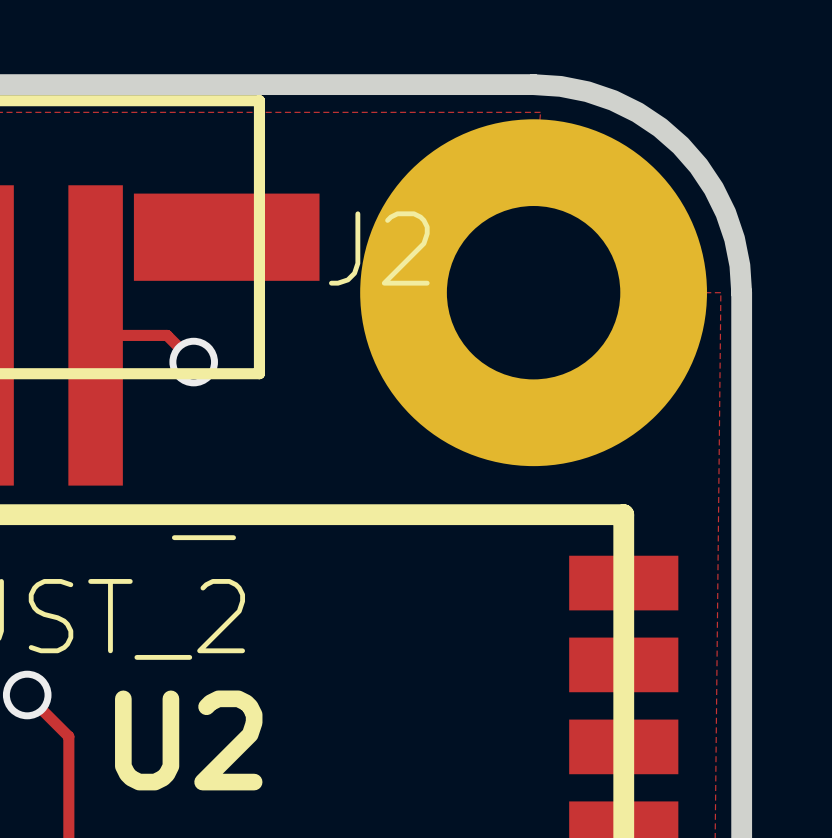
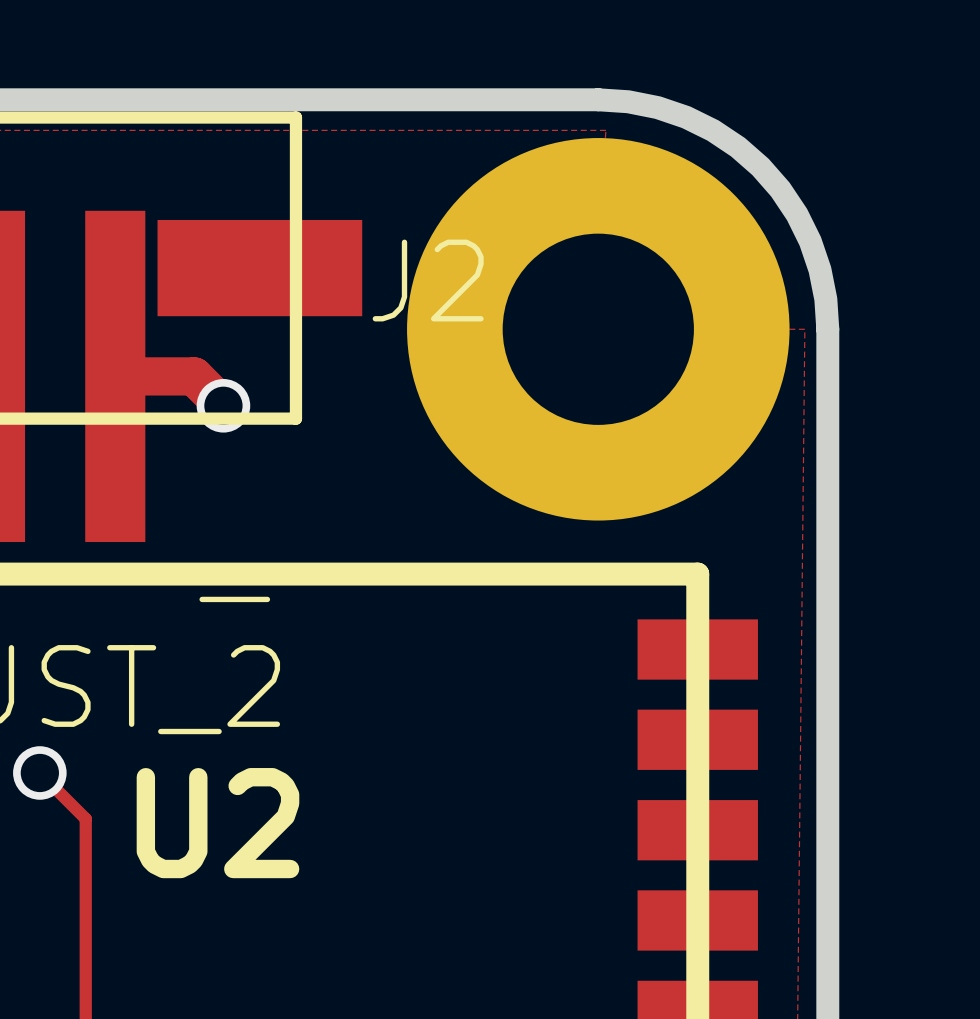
track width: thin (95, 335) (167, 335) (193, 362) -> thick (115, 376) (194, 376) (223, 405)

